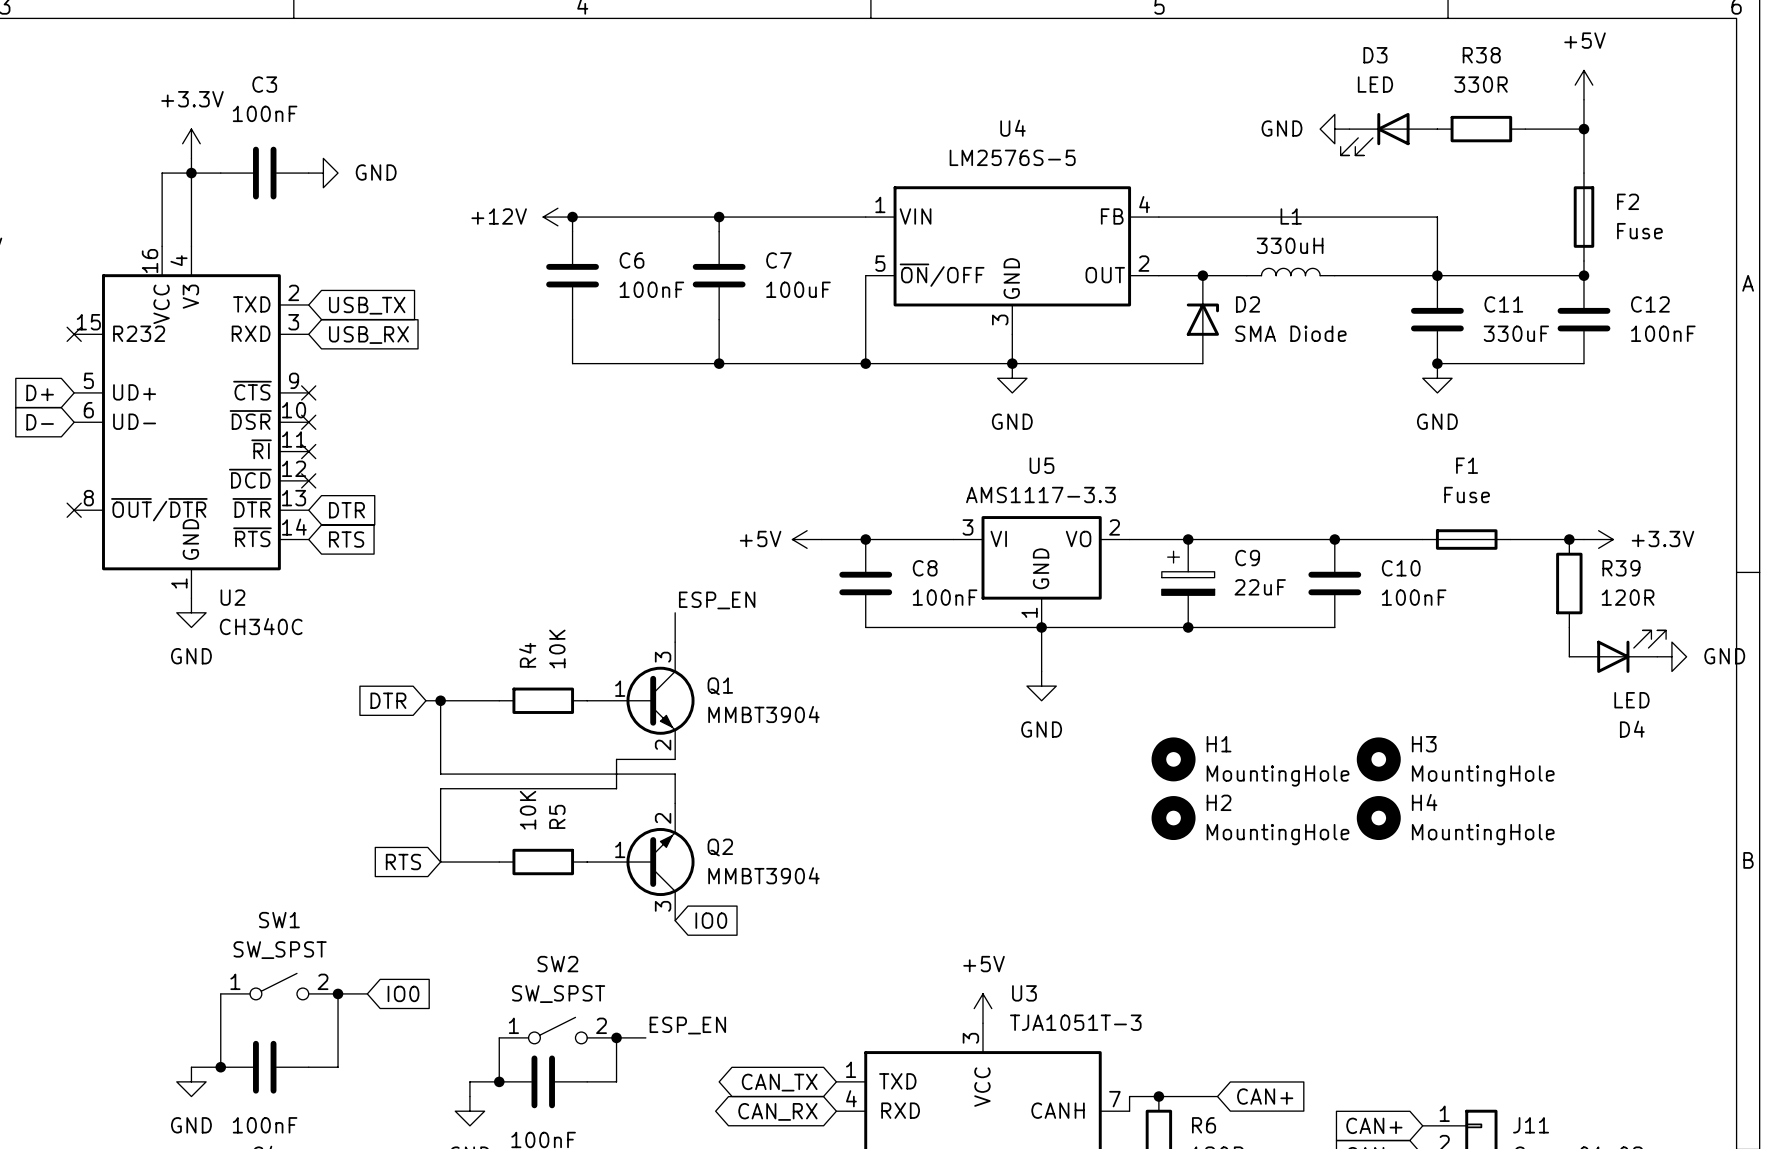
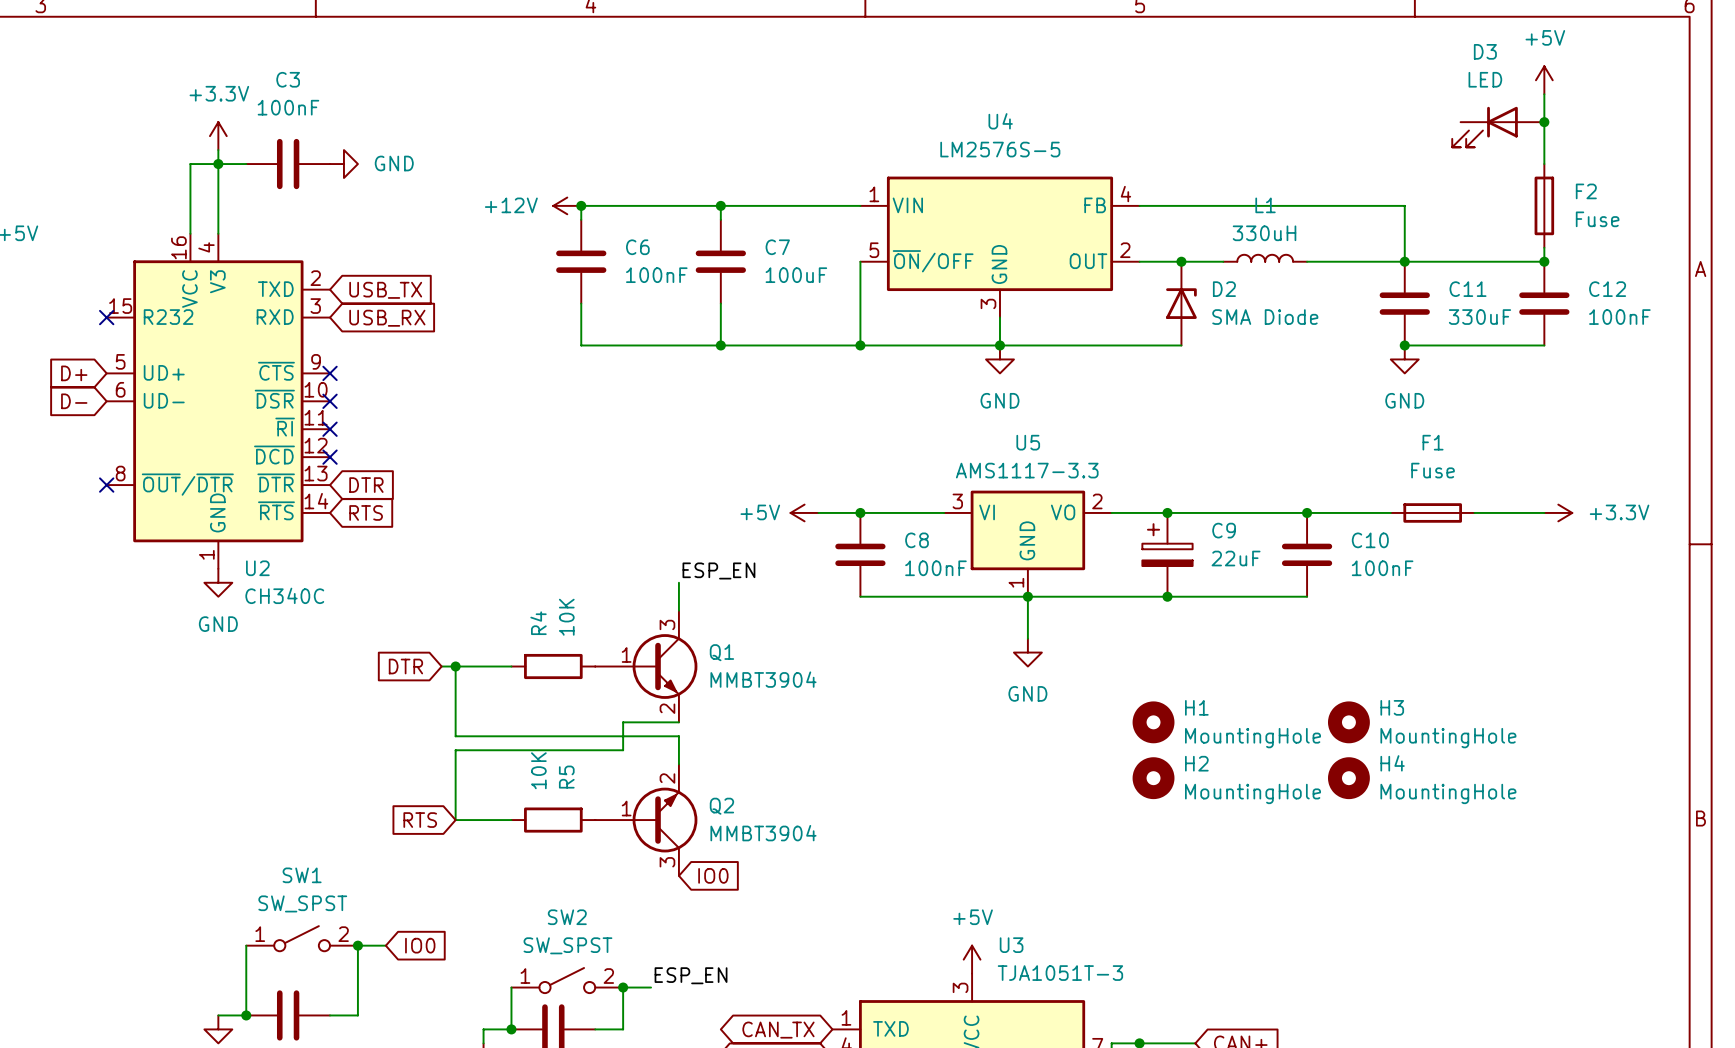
power symbol: GND (1334, 129) -> none
R38: 330R (1481, 129) -> none
D3 position: (1389, 134) -> (1498, 127)
junction: (1569, 539) -> none
R39: 120R (1569, 583) -> none
wire: (1569, 627) (1569, 656) -> none
D4: LED (1617, 651) -> none
power symbol: GND (1671, 656) -> none

